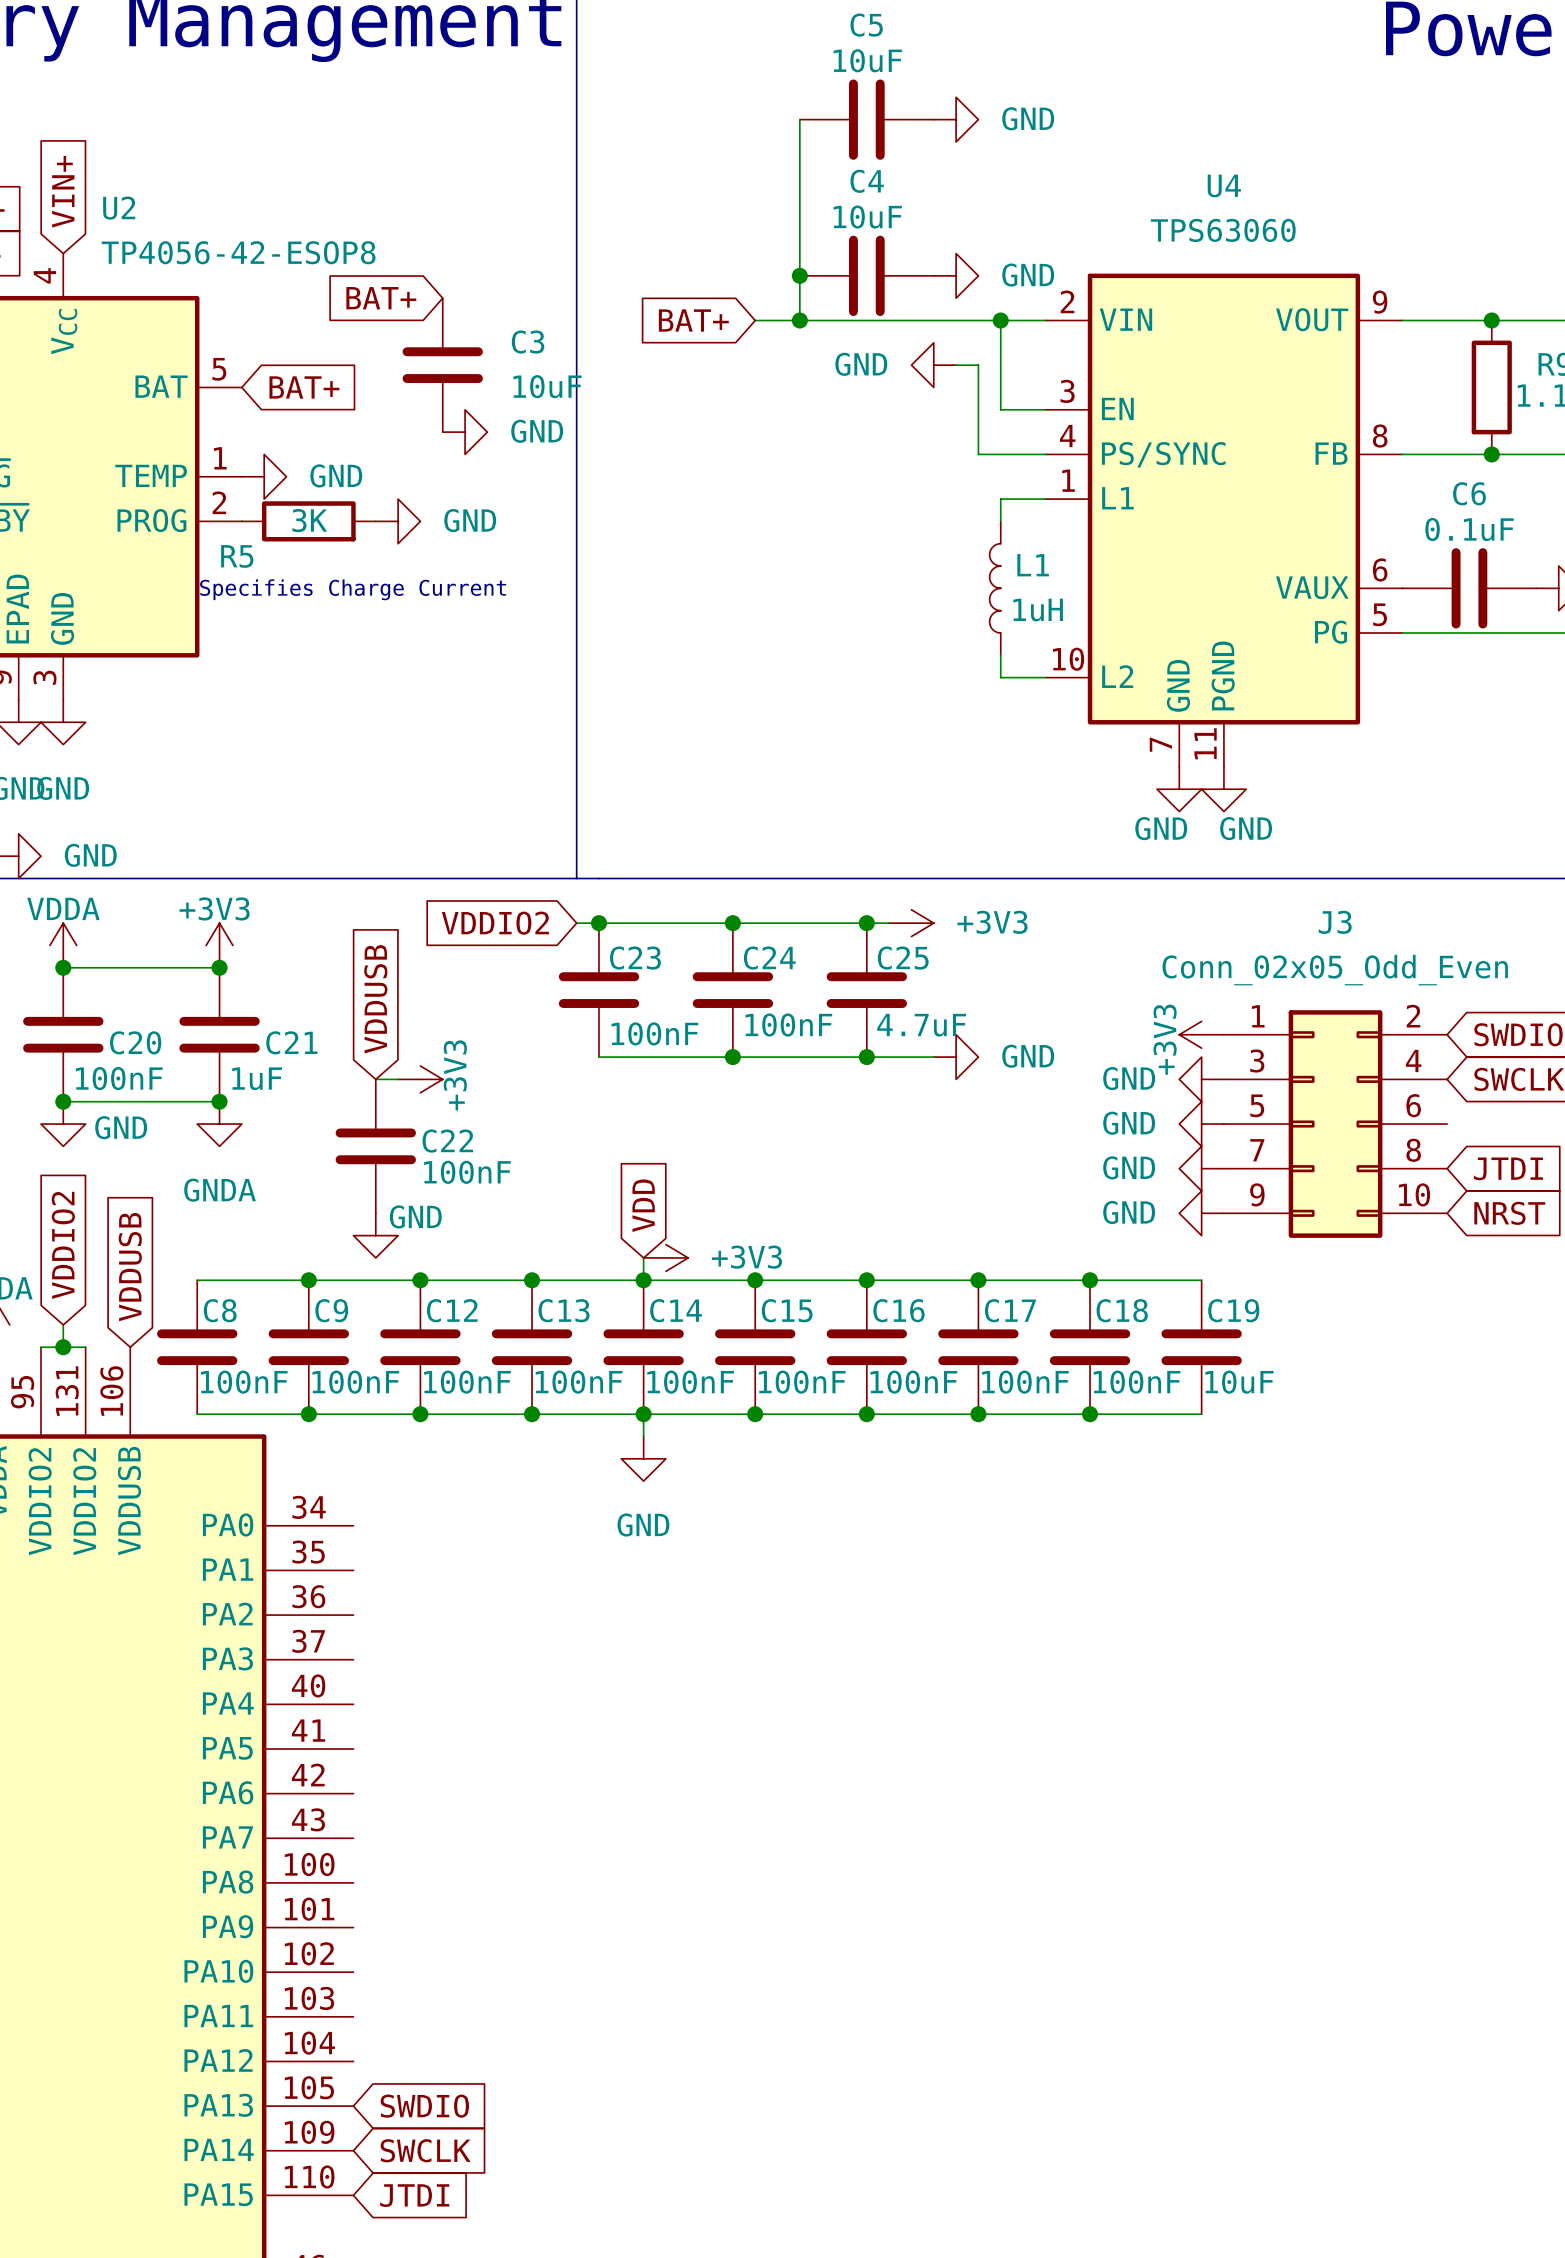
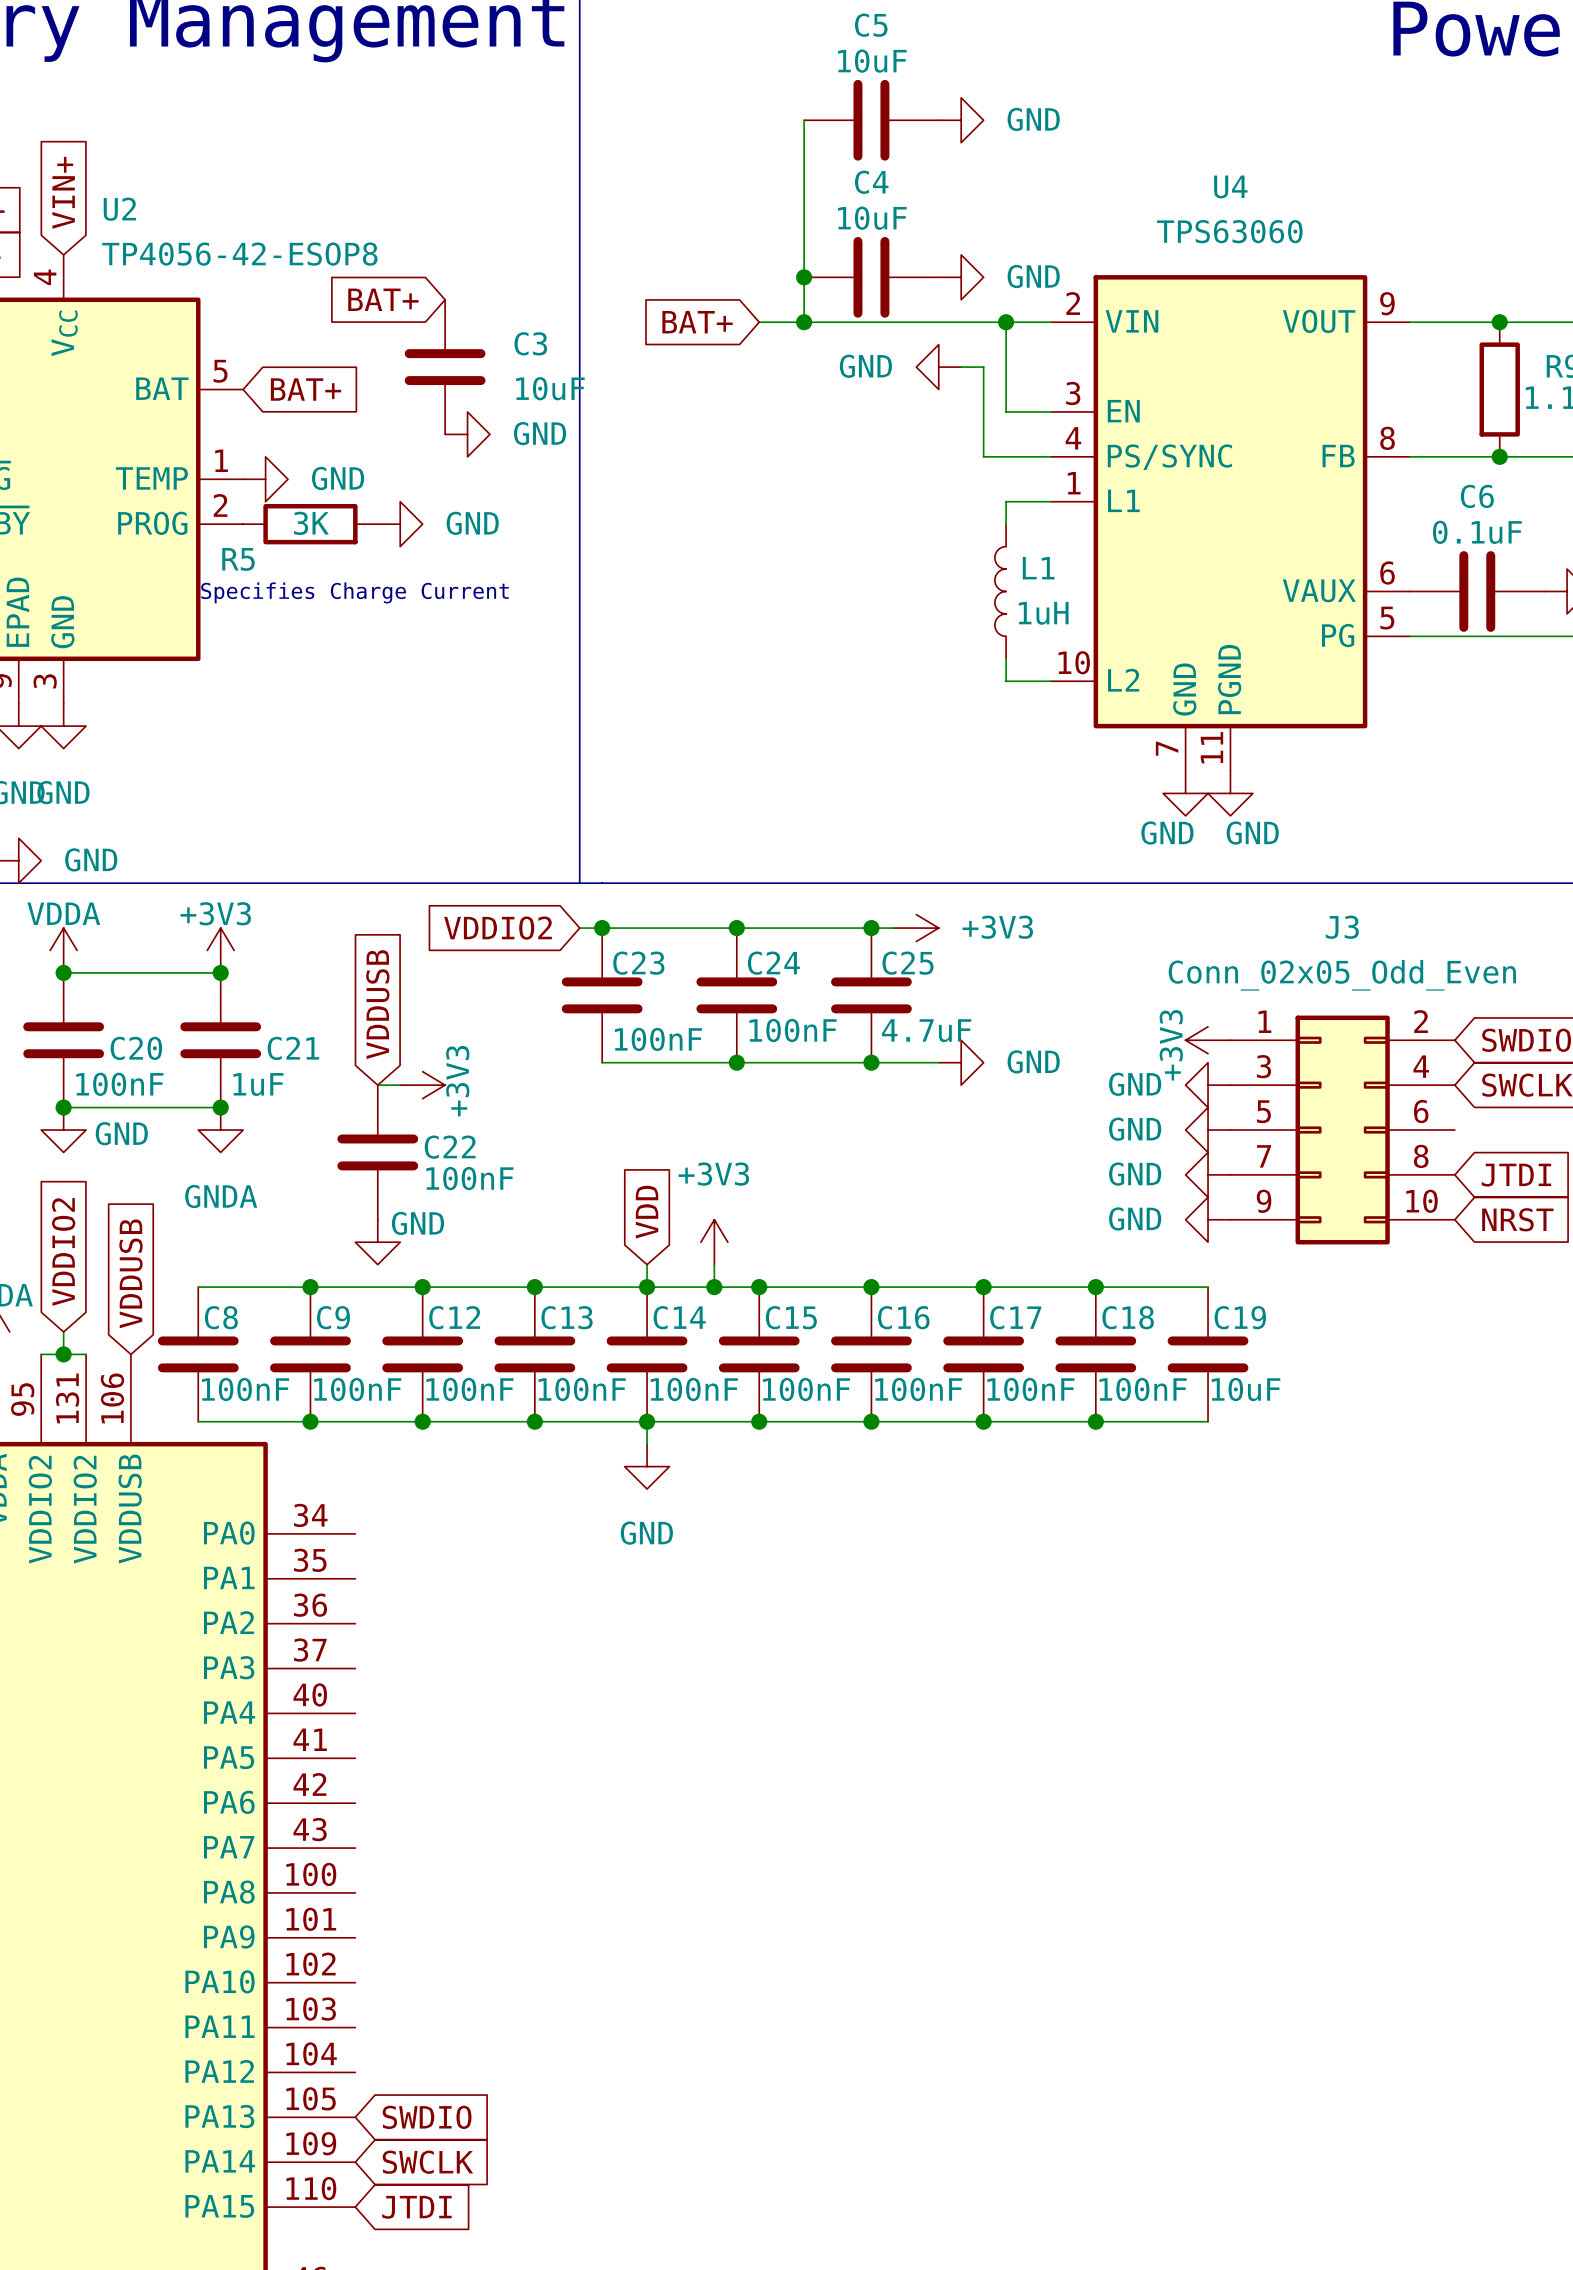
power symbol rotation: 0° (665, 1257) -> 90° counterclockwise (714, 1242)
power symbol position: +3V3 (665, 1257) -> +3V3 (714, 1242)
wire: none -> (714, 1264) (714, 1287)
junction: none -> (714, 1287)

